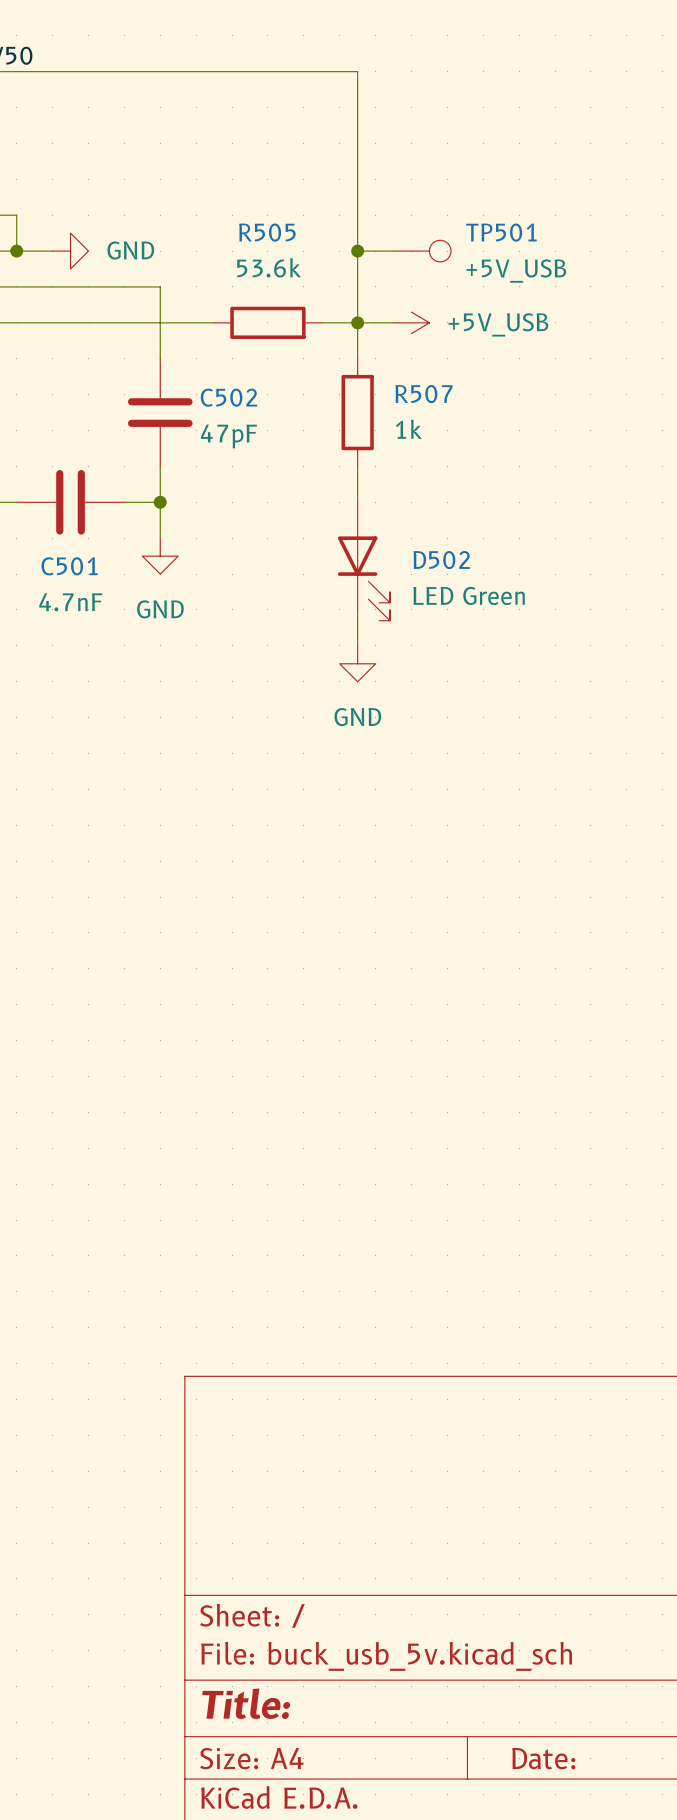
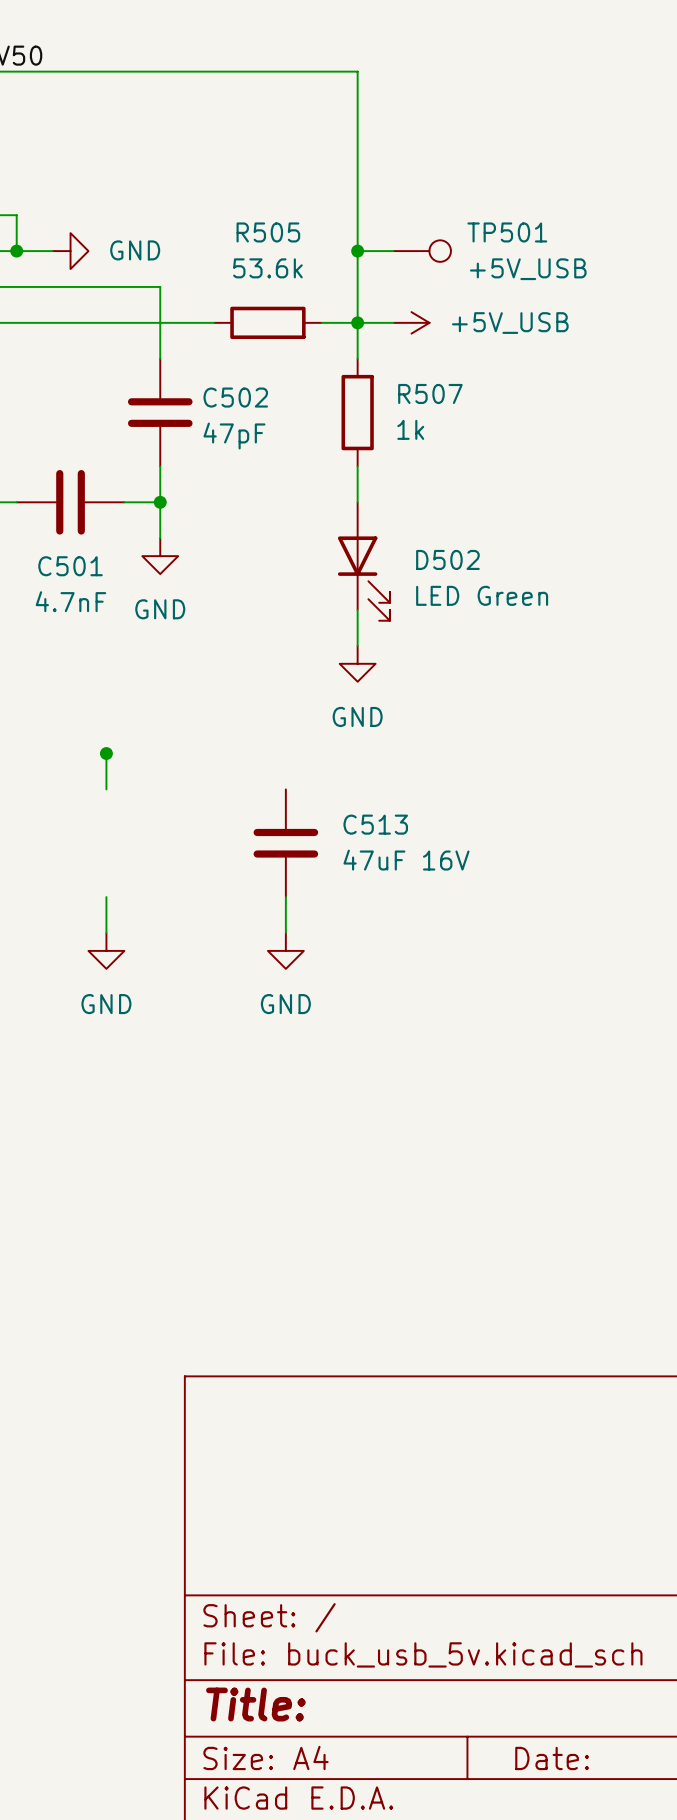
wire: none -> (106, 753) (106, 789)
junction: none -> (106, 753)
C513: none -> 47uF 16V (285, 843)
wire: none -> (106, 897) (106, 932)
wire: none -> (285, 897) (285, 932)
power symbol: none -> GND (106, 950)
power symbol: none -> GND (285, 950)

